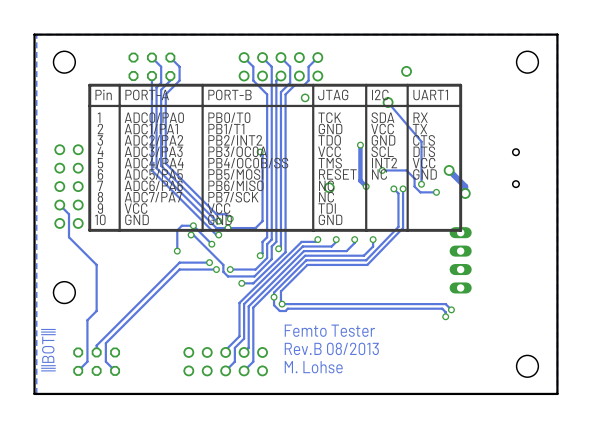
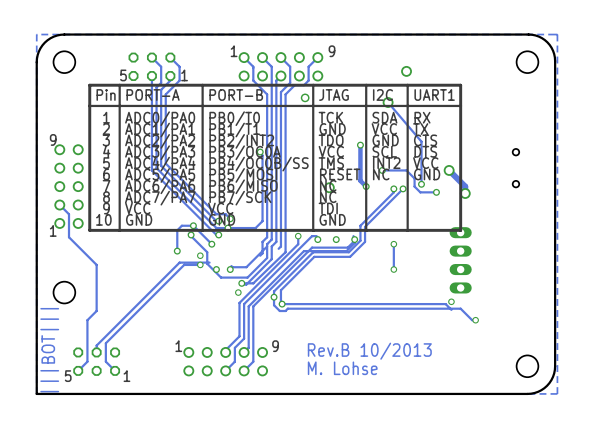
text: none -> 1 (234, 51)
text: none -> 9 (332, 51)
text: none -> 5 (123, 75)
text: none -> 1 (184, 75)
text: none -> 9 (53, 139)
track: (393, 188) (398, 193) (398, 226) (366, 260) (306, 260) (274, 292) -> (393, 188) (393, 192) (360, 225) (360, 240) (348, 252) (313, 252) (274, 292)
track: (403, 188) (403, 228) (367, 264) (307, 264) (280, 291) -> (403, 188) (365, 226) (365, 241) (350, 256) (314, 256) (280, 291)
text: none -> 1 (53, 230)
track: (191, 234) (193, 234) (223, 264) (223, 271) (227, 276) (254, 276) -> (242, 284) (246, 284) (254, 276)
via: none -> (298, 236)
track: (317, 239) (315, 241) (301, 241) (239, 302) -> (298, 236) (298, 244) (239, 302)
track: (336, 239) (331, 246) (302, 246) (244, 304) -> (316, 236) (312, 236) (244, 304)
track: (373, 239) (373, 246) (363, 255) (305, 255) (253, 307) -> (353, 236) (353, 241) (347, 247) (312, 247) (253, 307)
via: (373, 239) -> none
track: none -> (393, 244) (393, 269)
via: none -> (393, 244)
track: none -> (267, 246) (246, 267) (231, 266)
via: (278, 248) -> none
via: none -> (200, 255)
via: (260, 255) -> none
via: (209, 262) -> none
via: none -> (200, 264)
track: (216, 269) (179, 269) -> (200, 264) (184, 264) (179, 269)
track: (255, 269) (230, 269) -> (255, 269) (247, 277) (221, 277) (207, 263) (207, 252) (188, 233)
via: none -> (393, 269)
via: none -> (238, 292)
via: none -> (451, 301)
track: (442, 308) (445, 312) (445, 316) -> (442, 308) (460, 308) (472, 320) (475, 320)
via: (451, 309) -> none
via: (445, 316) -> none
via: none -> (475, 320)
text: Femto Tester (329, 330) -> none
text: none -> 1 (178, 346)
text: none -> 9 (275, 346)
text: Rev.B 08/2013 (331, 348) -> Rev.B 10/2013 (369, 351)
text position: M. Lohse (313, 367) -> M. Lohse (342, 368)
text: none -> 5 (68, 376)
text: none -> 1 (126, 376)
board edge: (527, 393) (557, 393) (557, 34) (34, 34) (34, 393) (36, 393) -> (527, 393) (538, 391) (547, 385) (553, 376) (555, 366) (554, 57) (547, 42) (538, 36) (528, 34) (64, 34) (47, 40) (40, 48) (36, 62) (36, 393)

